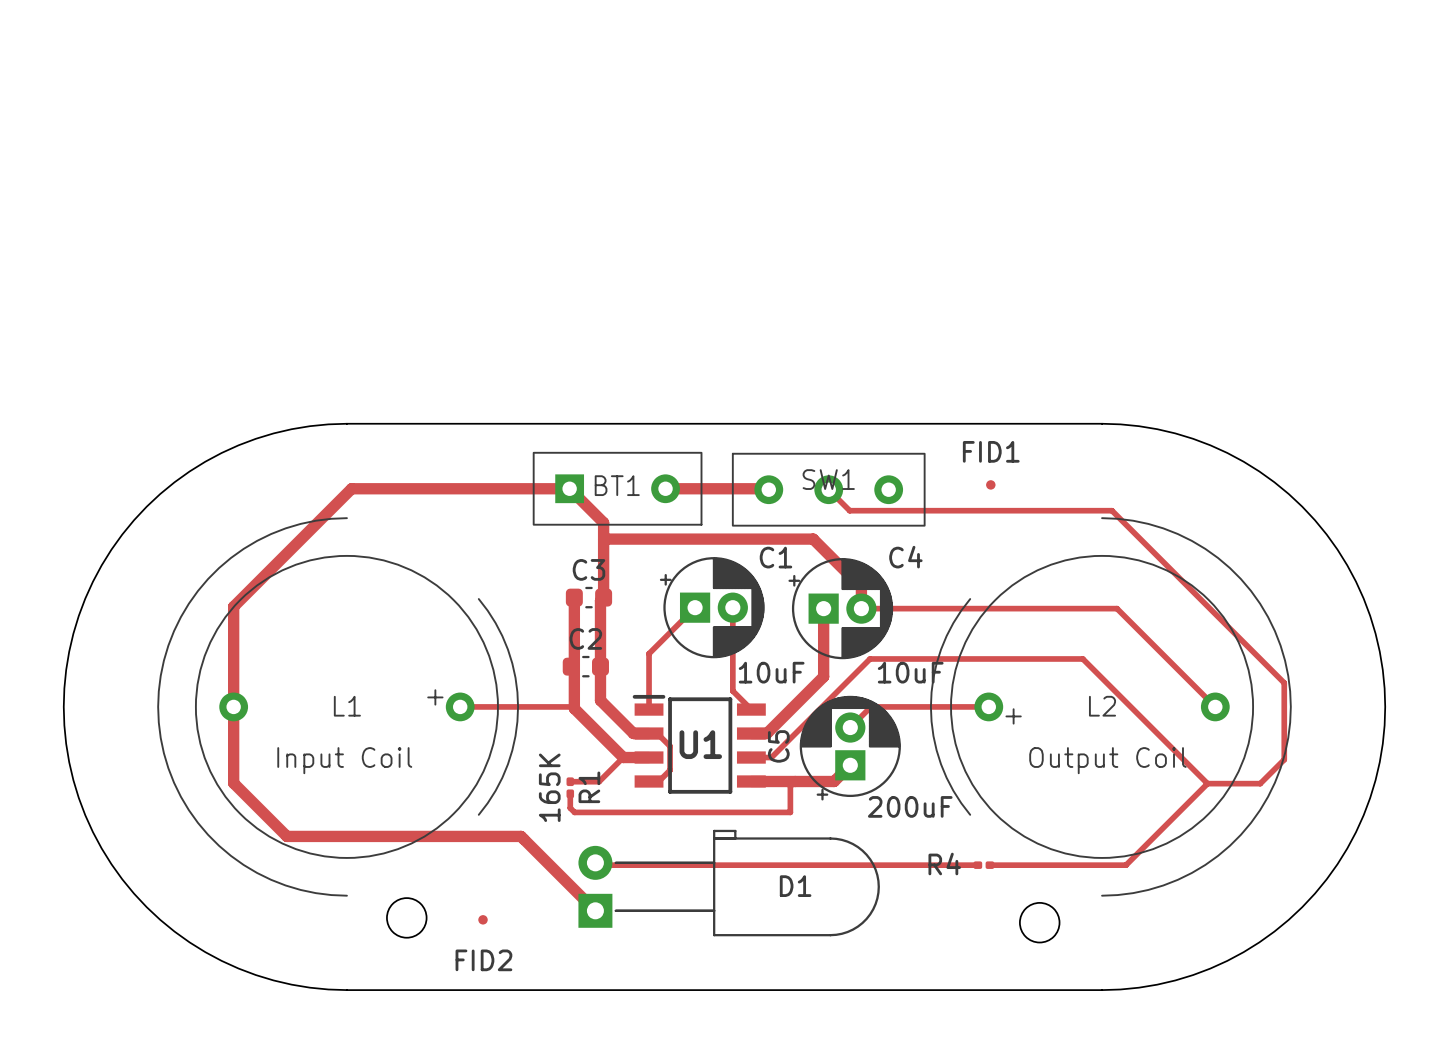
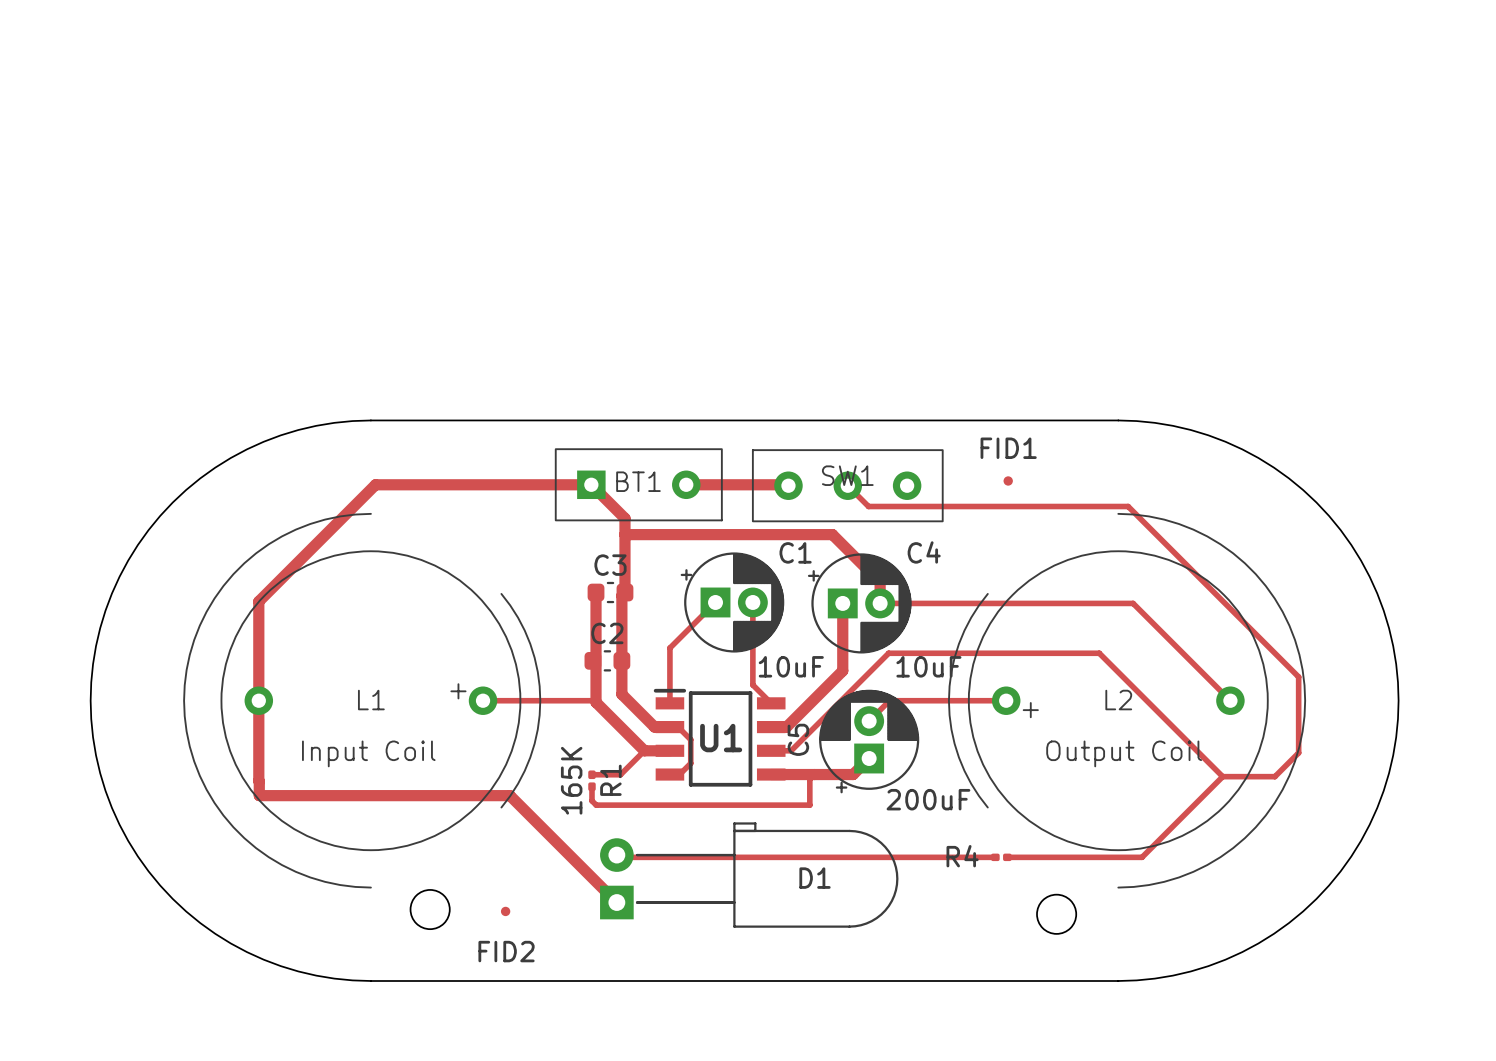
top track: (233, 783) (286, 836) (521, 836) -> (258, 776) (259, 795) (509, 795) (543, 828)

